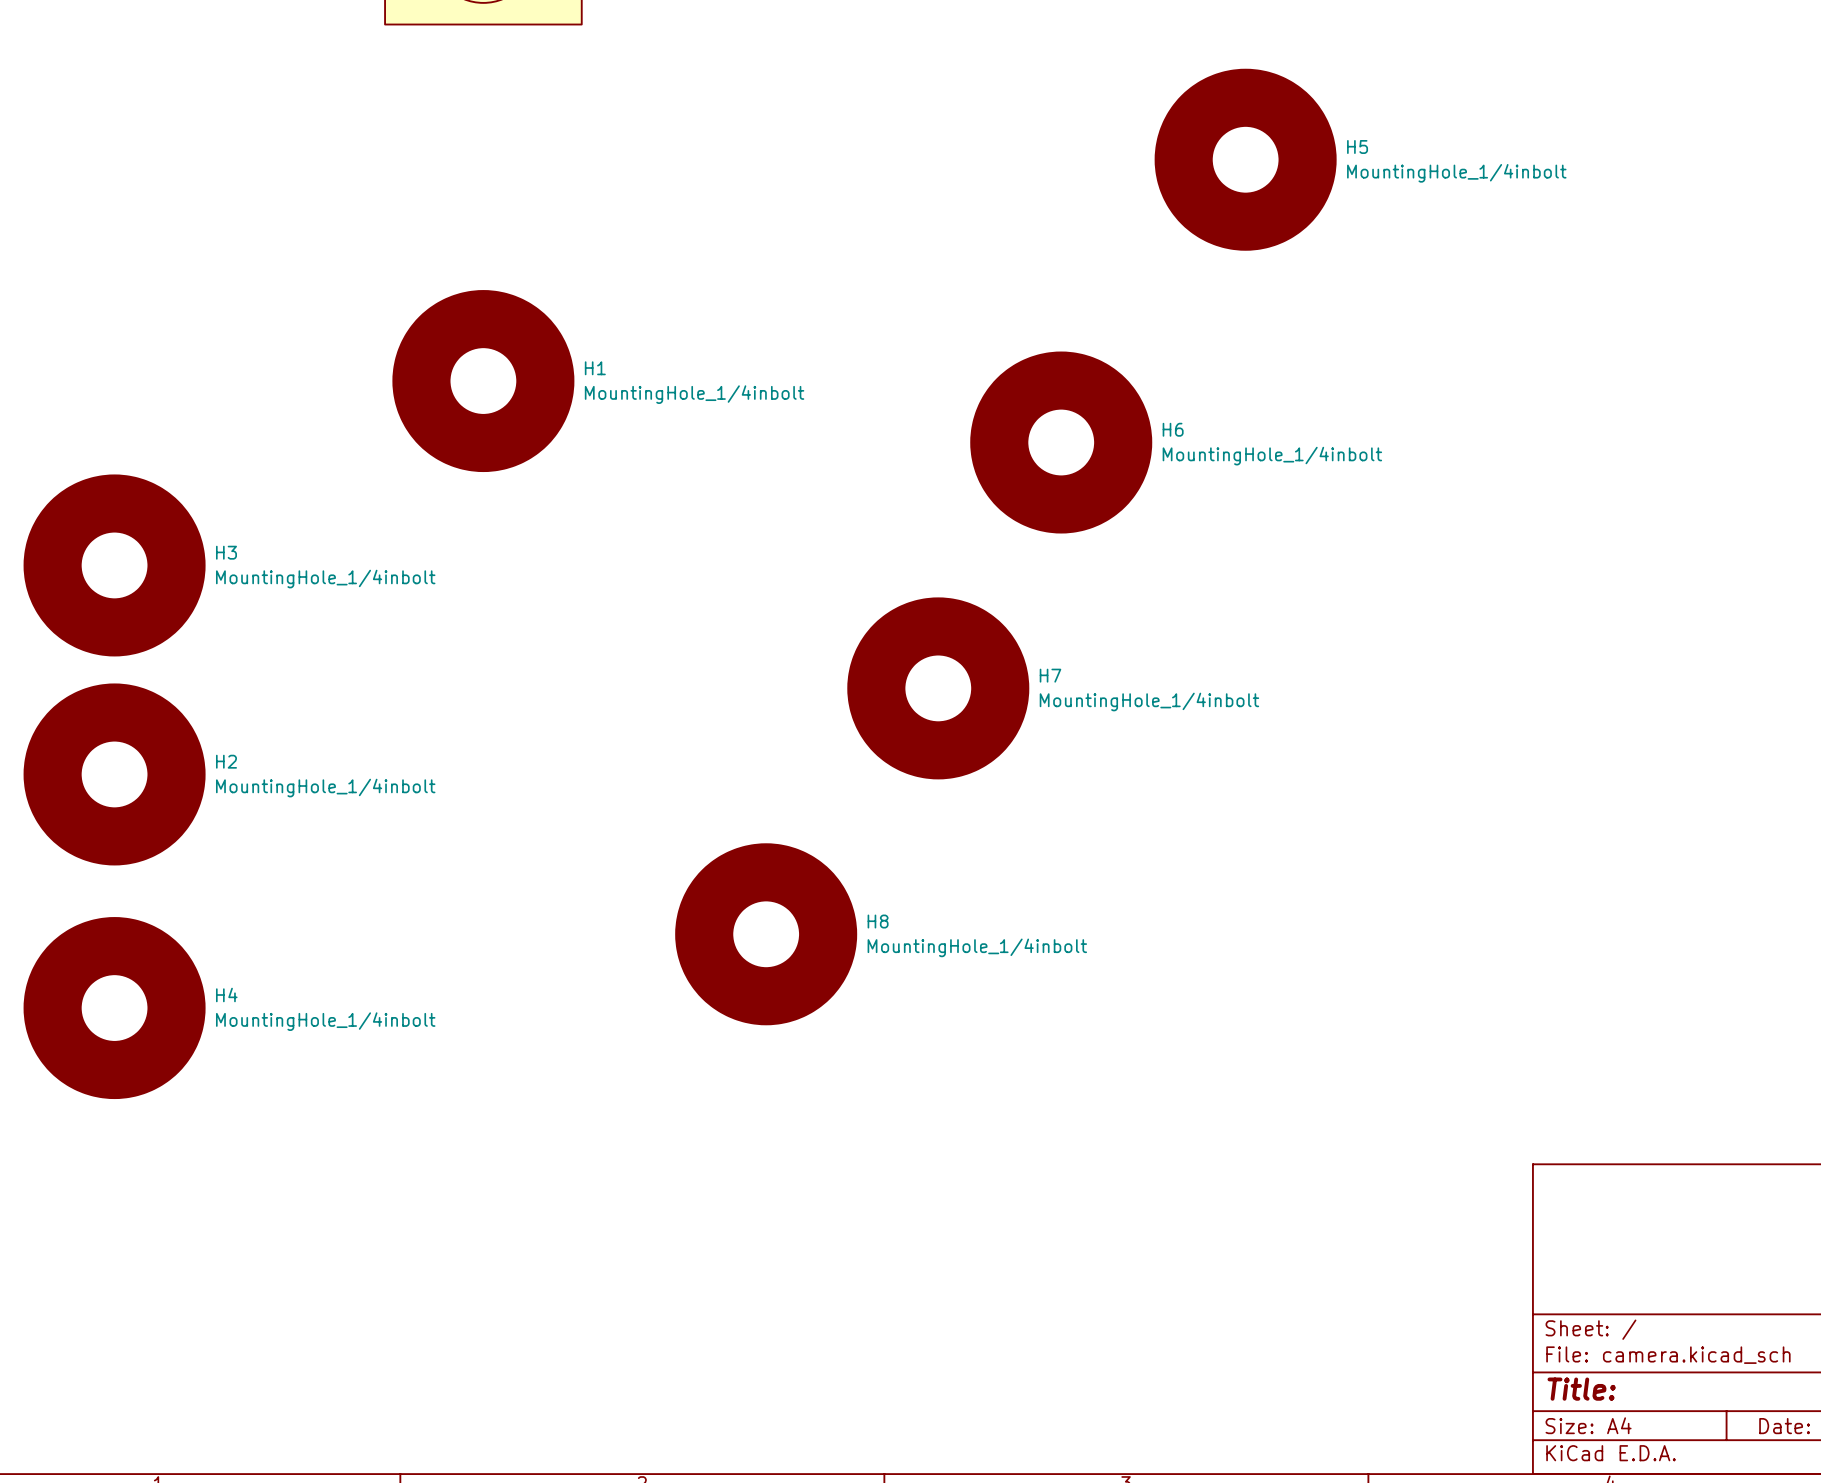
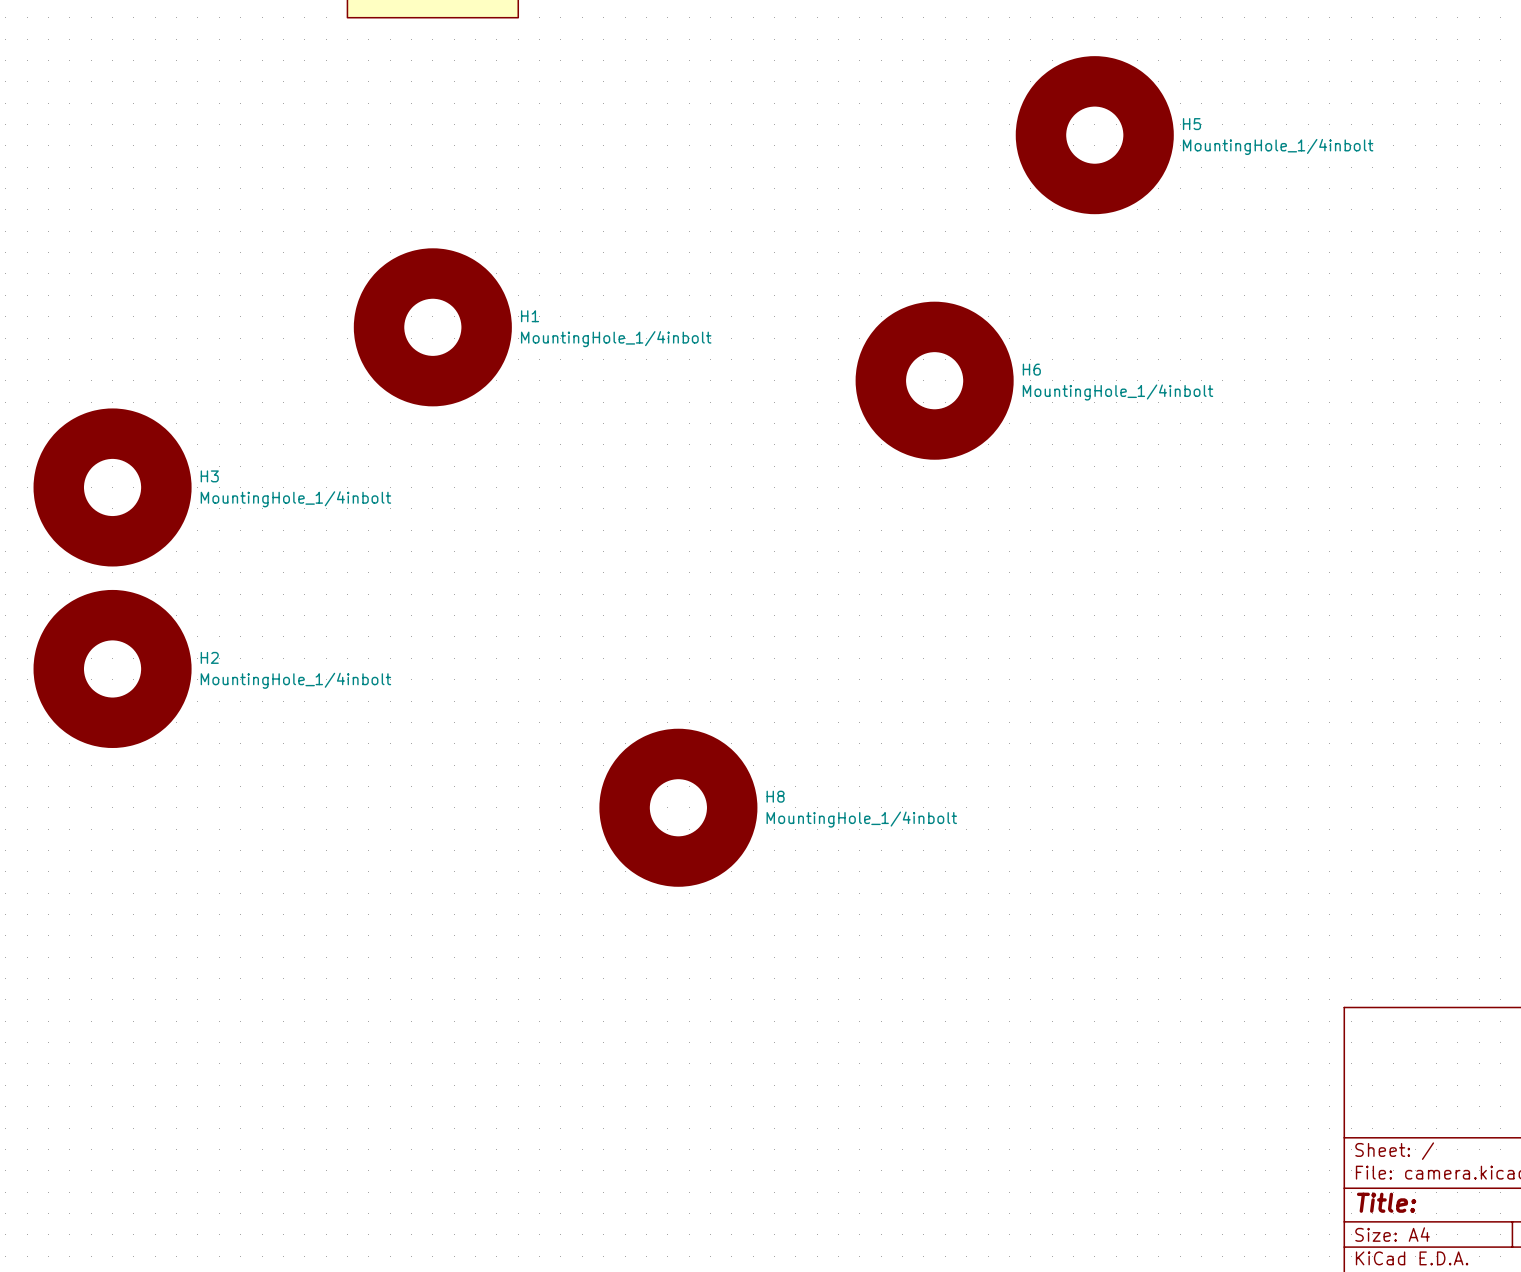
H7: MountingHole_1/4inbolt (938, 688) -> none
H4: MountingHole_1/4inbolt (114, 1008) -> none

